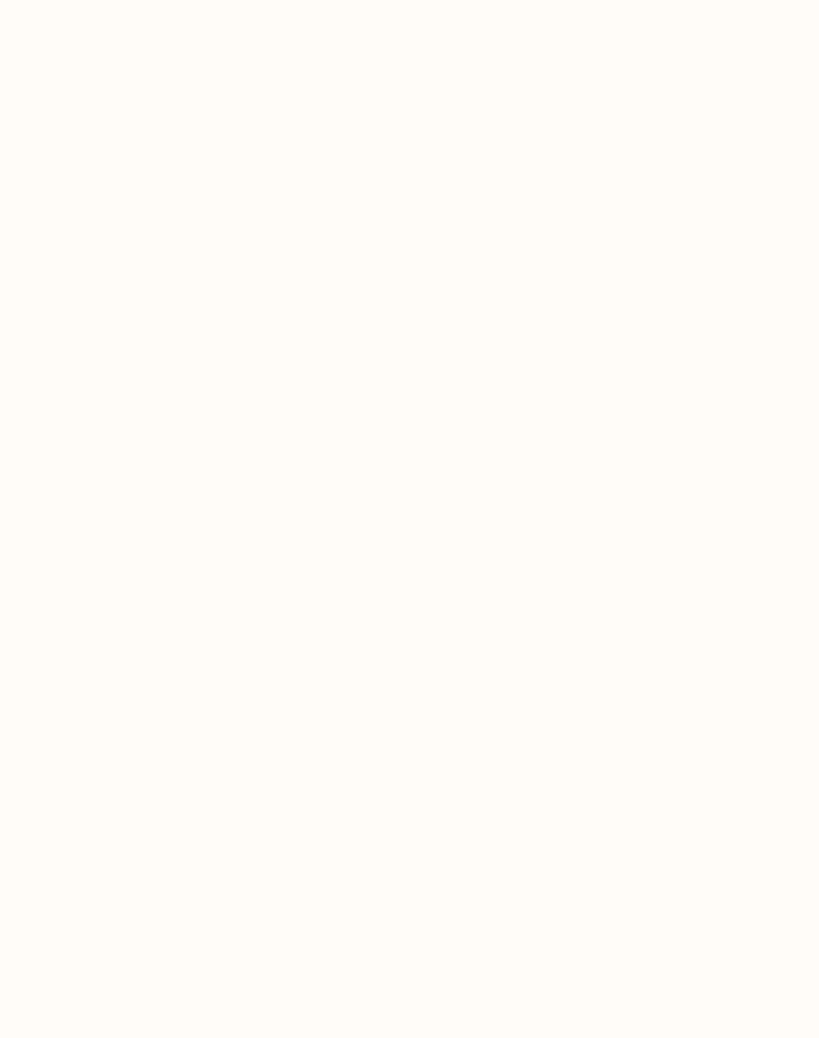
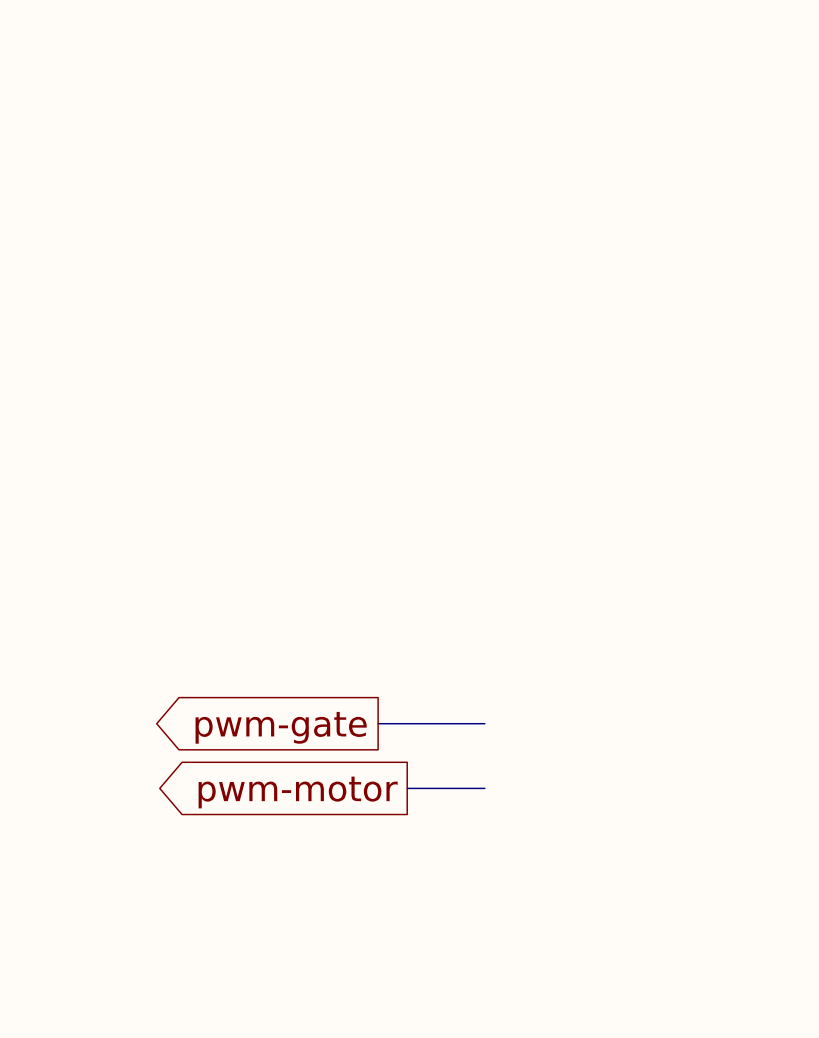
wire: none -> (378, 723) (484, 723)
global label: none -> pwm-gate (281, 727)
wire: none -> (407, 788) (484, 788)
global label: none -> pwm-motor (298, 792)

